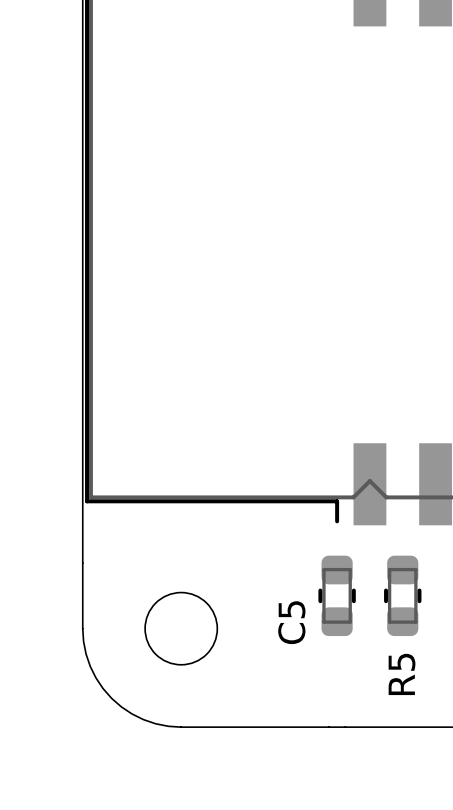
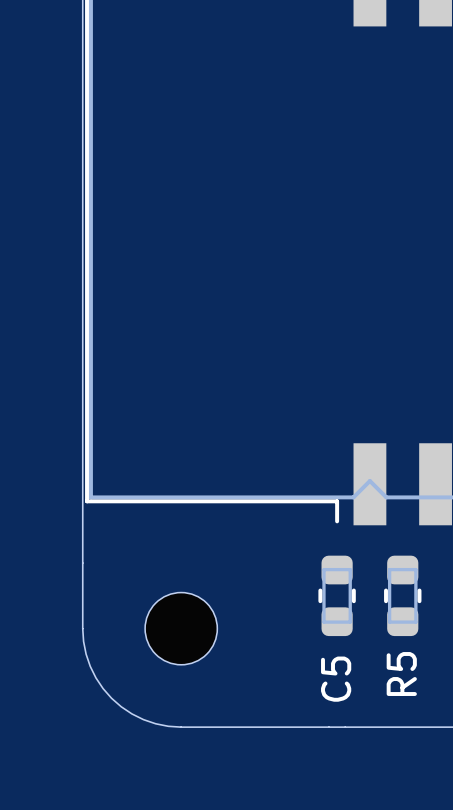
C5 name position: C5 (291, 622) -> C5 (336, 679)

